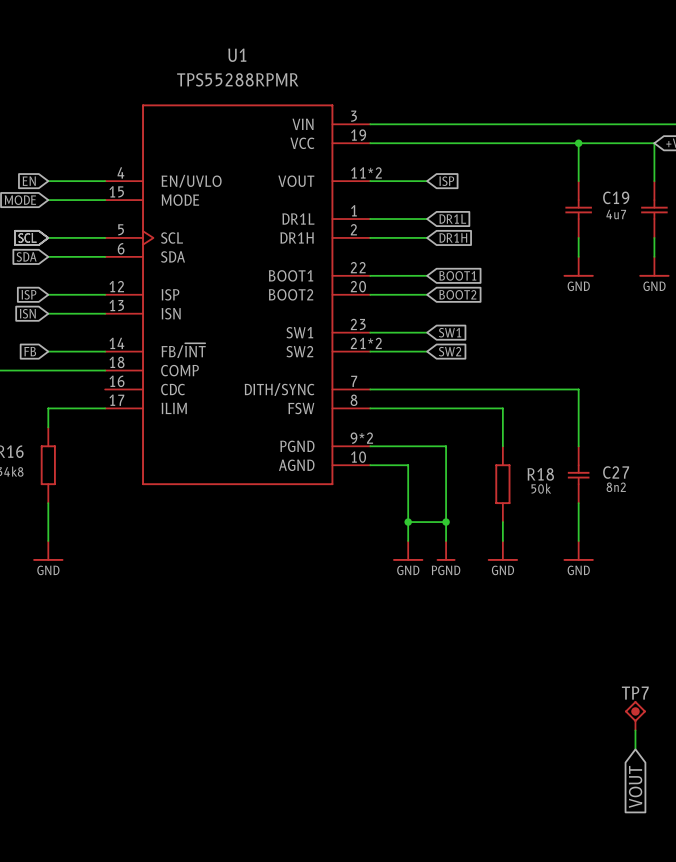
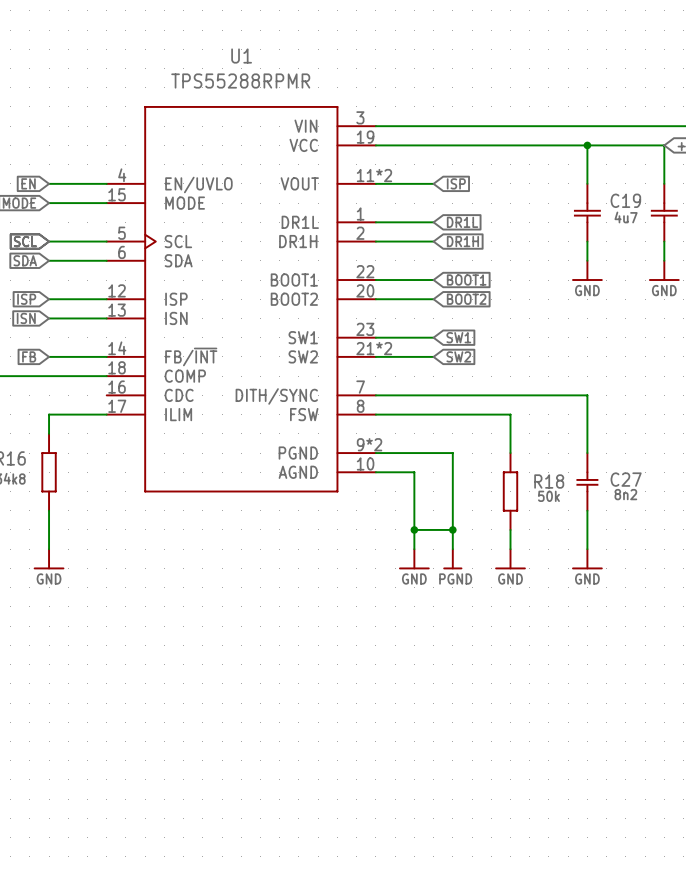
TP7: (635, 716) -> none
wire: (635, 730) (635, 749) -> none
global label: VOUT (635, 786) -> none

